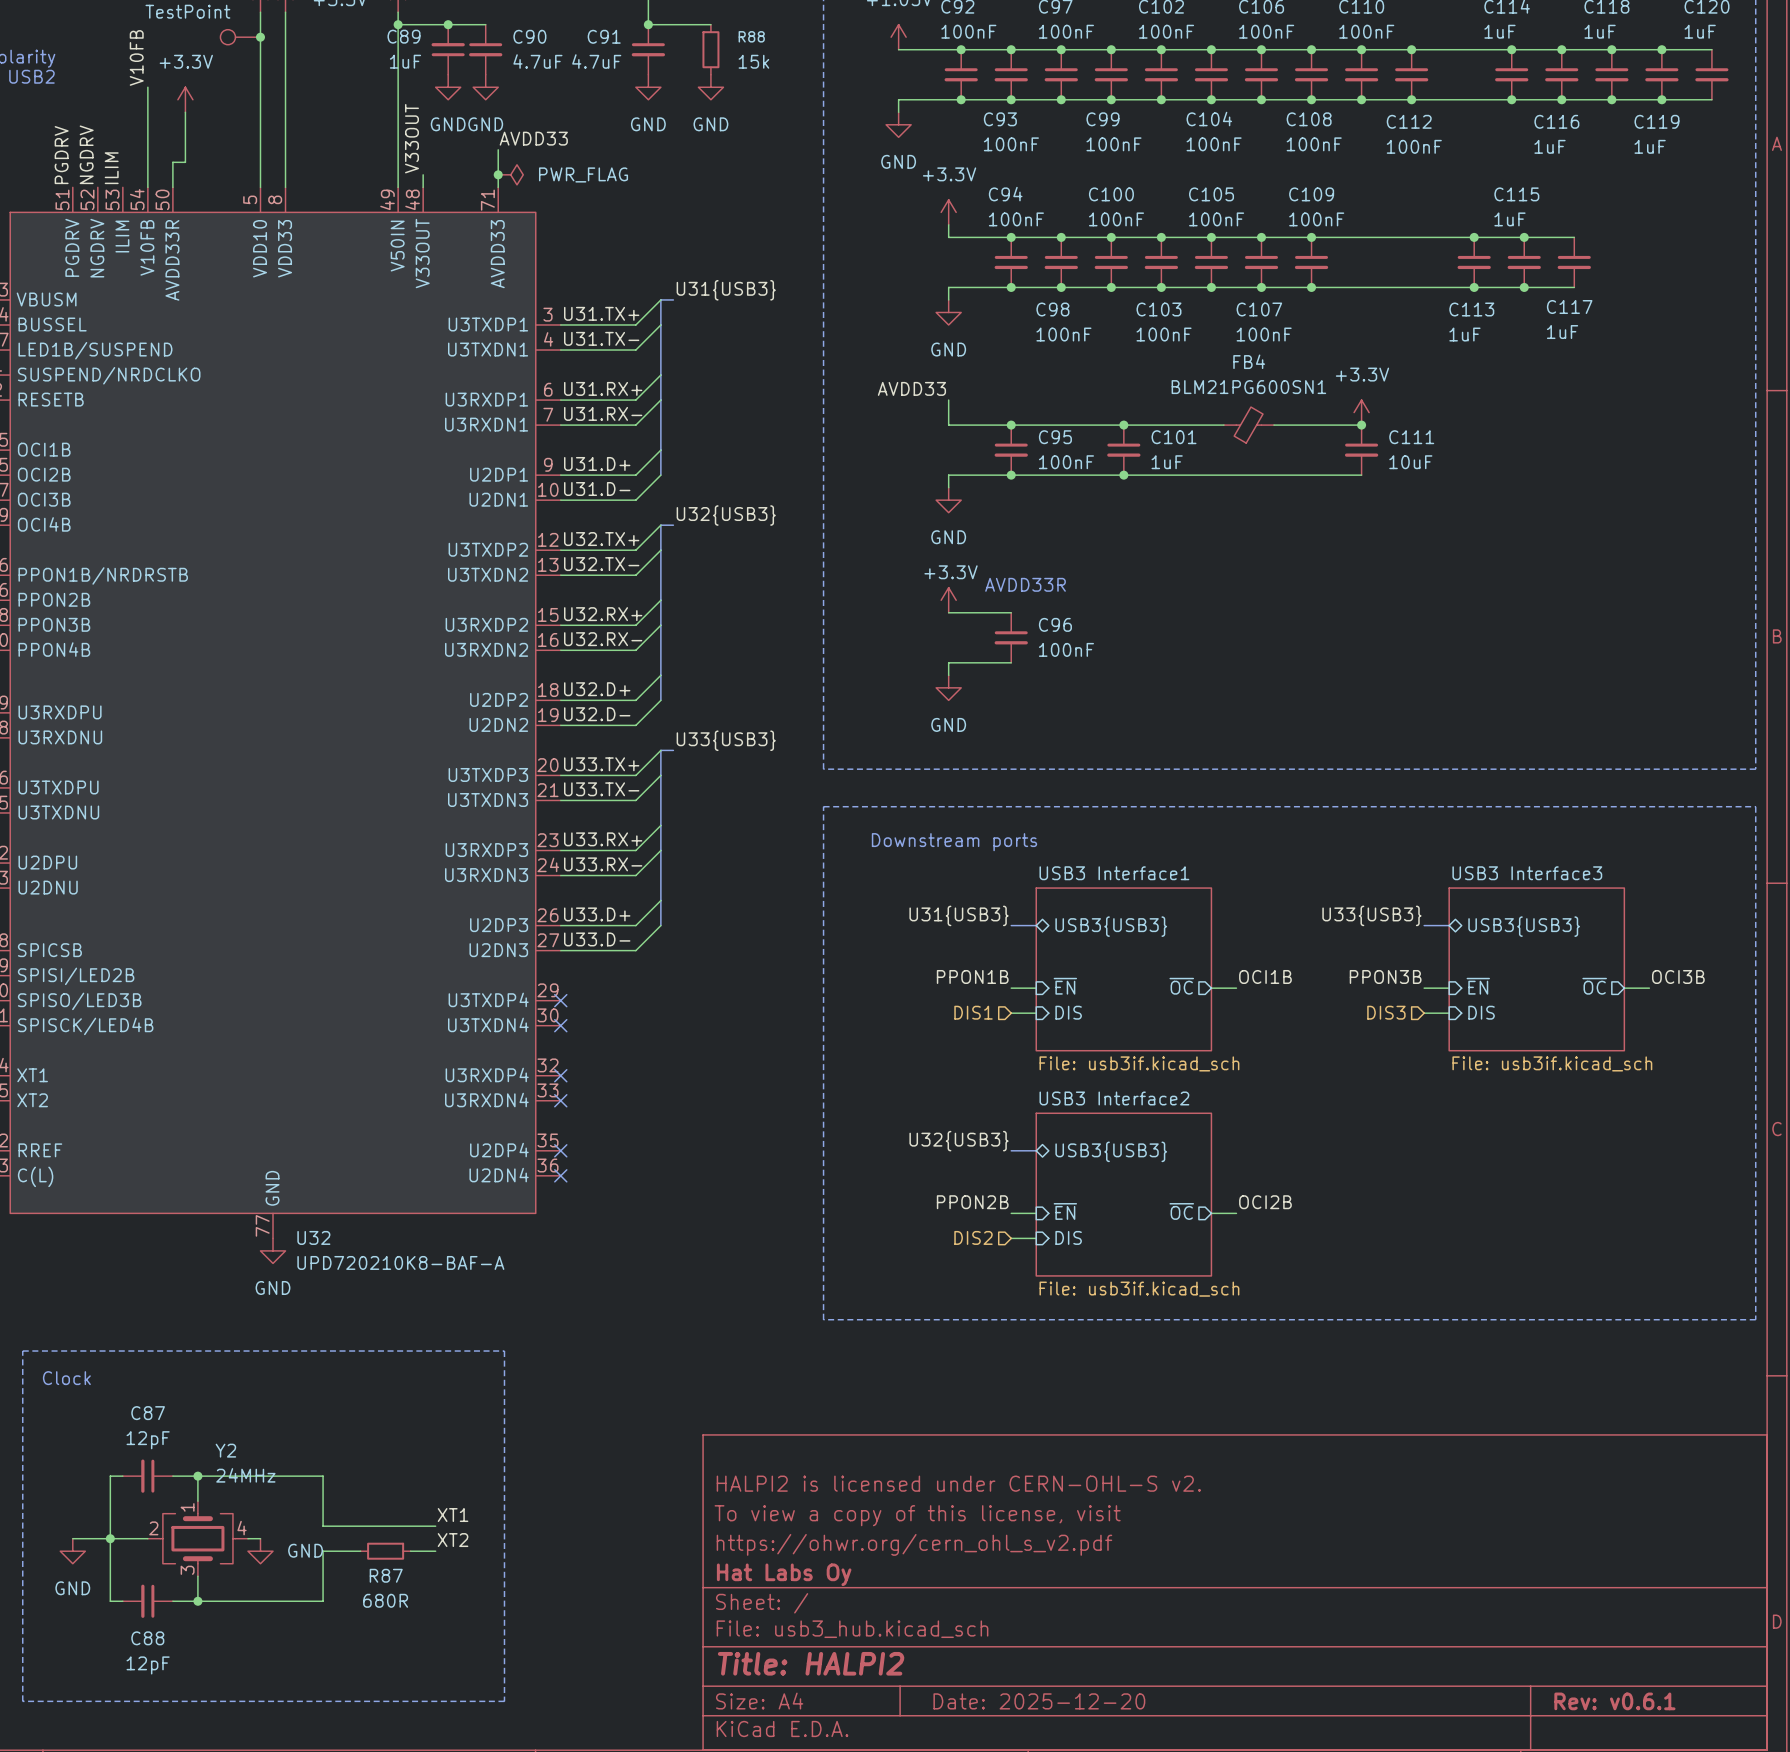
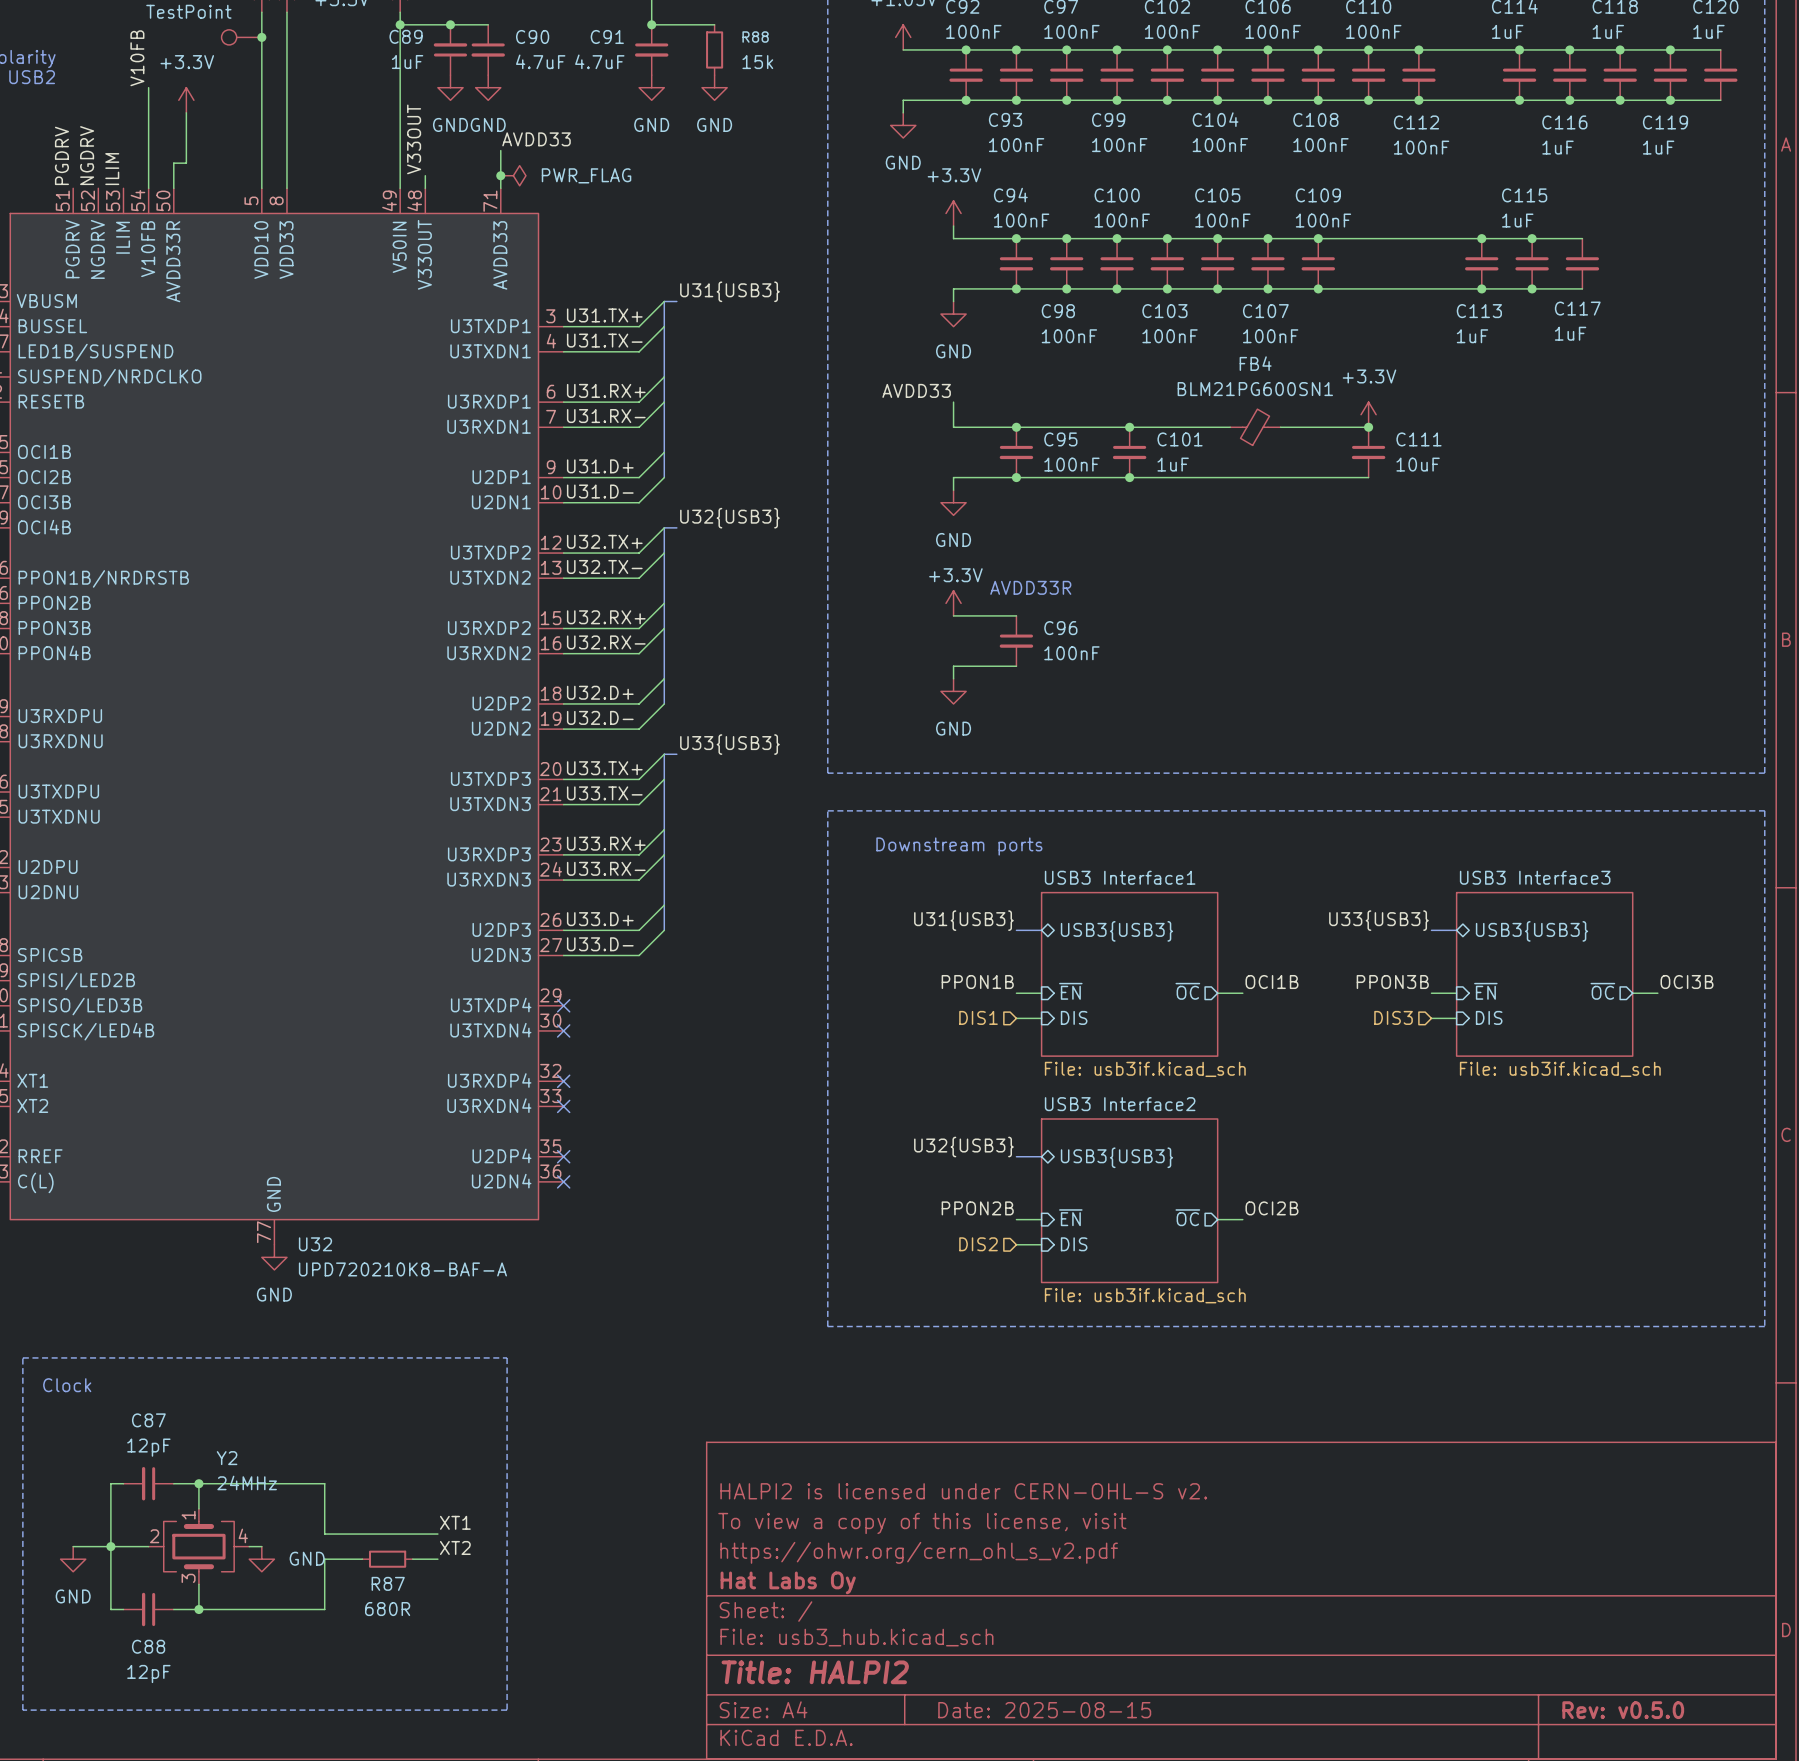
title block: Date: 2025-12-20 (1039, 1701) -> Date: 2025-08-15 (1044, 1710)
title block: Rev: v0.6.1 (1614, 1701) -> Rev: v0.5.0 (1623, 1710)

